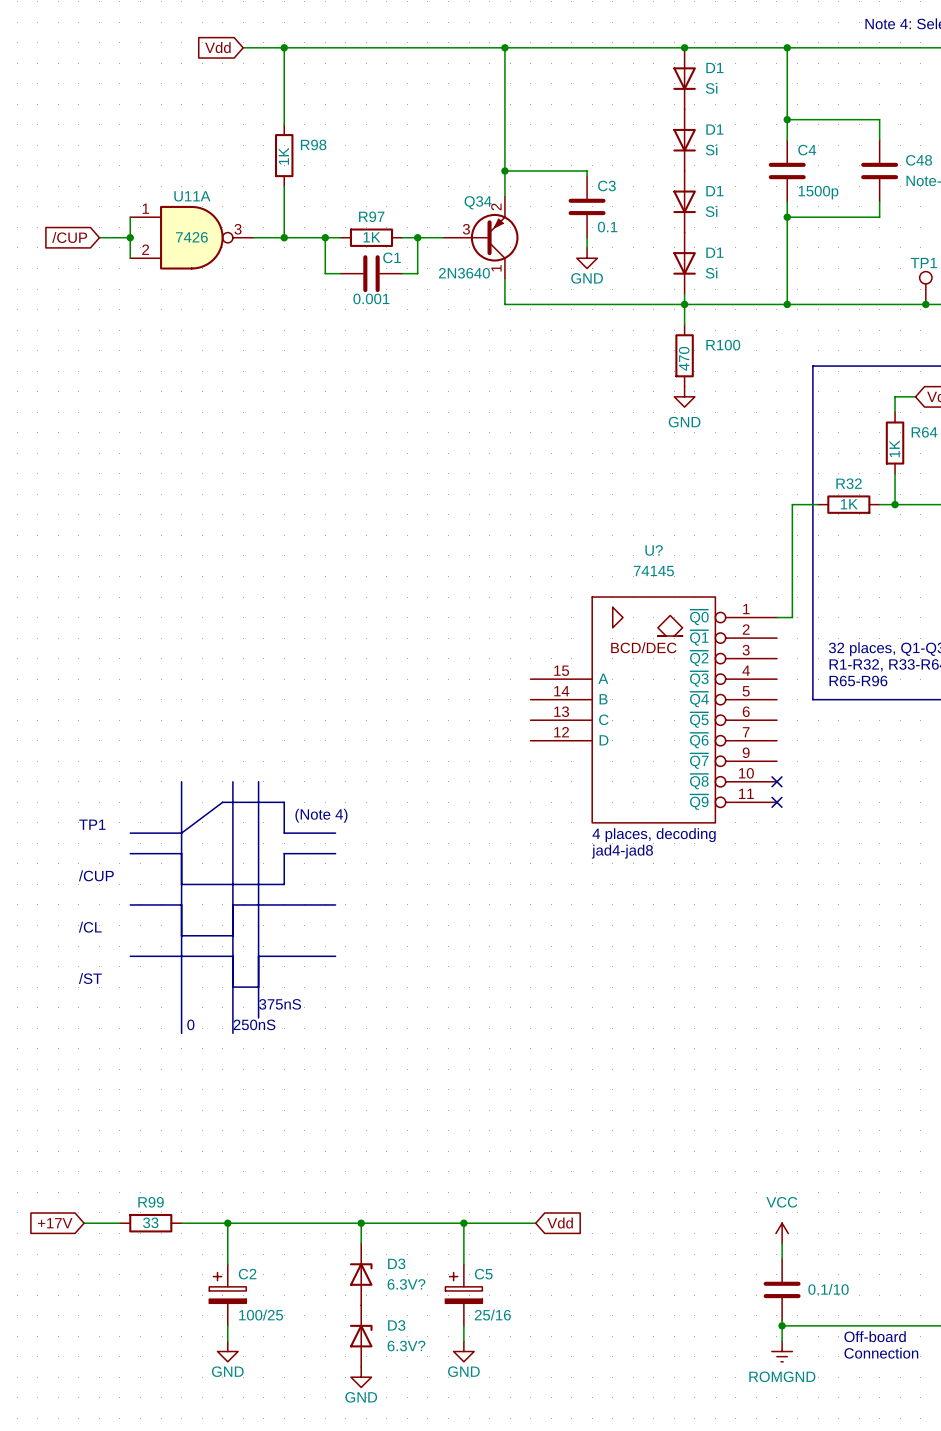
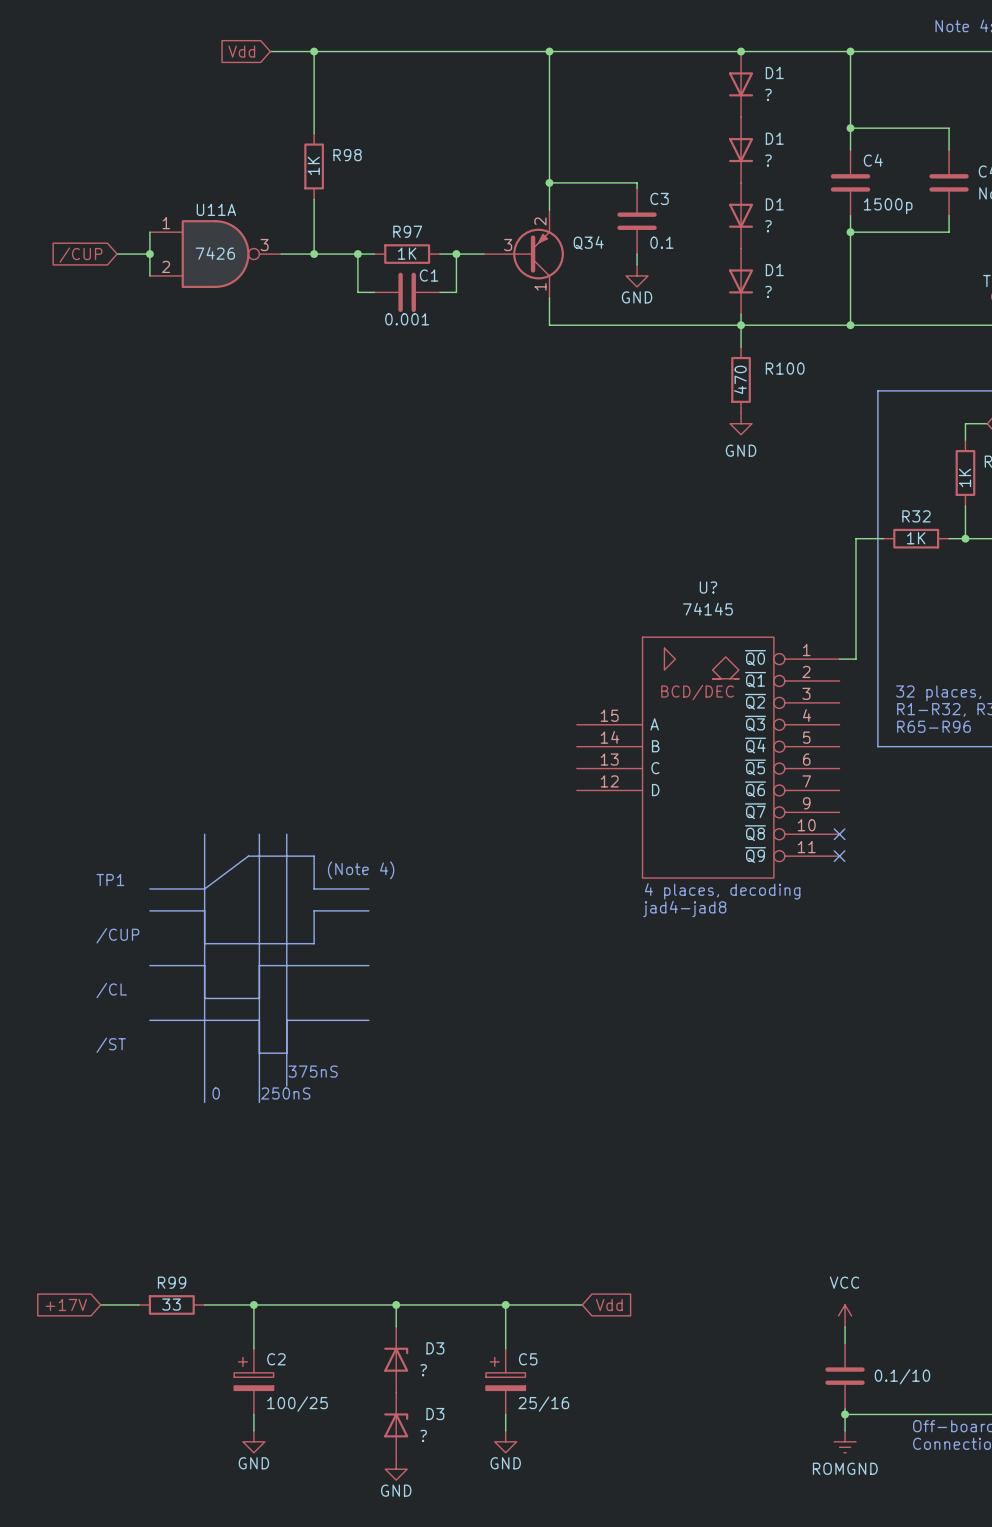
D1 value: Si (711, 88) -> ? (768, 94)
D1 value: Si (711, 149) -> ? (768, 160)
Q34 name position: Q34 (478, 202) -> Q34 (588, 242)
D1 value: Si (711, 211) -> ? (768, 226)
Q34 value: 2N3640 (464, 273) -> none
D1 value: Si (711, 273) -> ? (768, 291)
D3 value: 6.3V? (406, 1284) -> ? (423, 1370)
D3 value: 6.3V? (406, 1346) -> ? (423, 1435)

